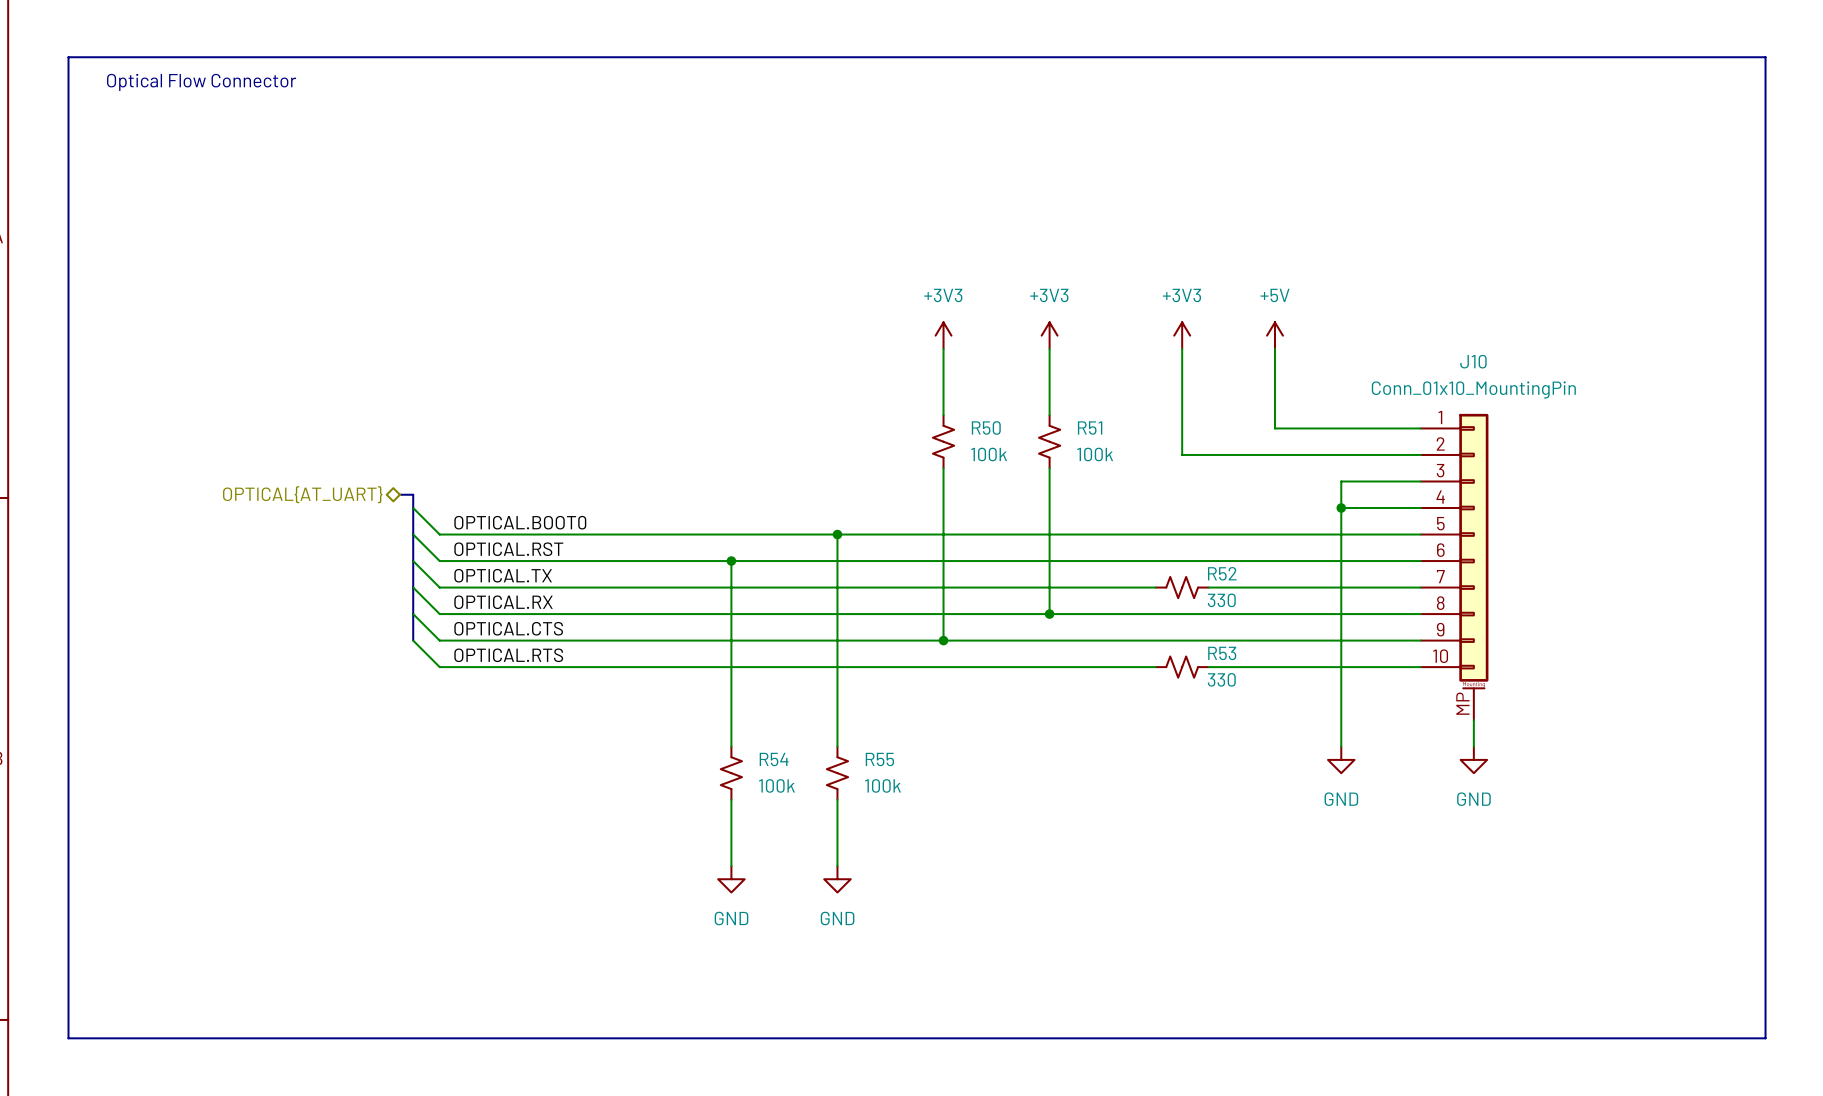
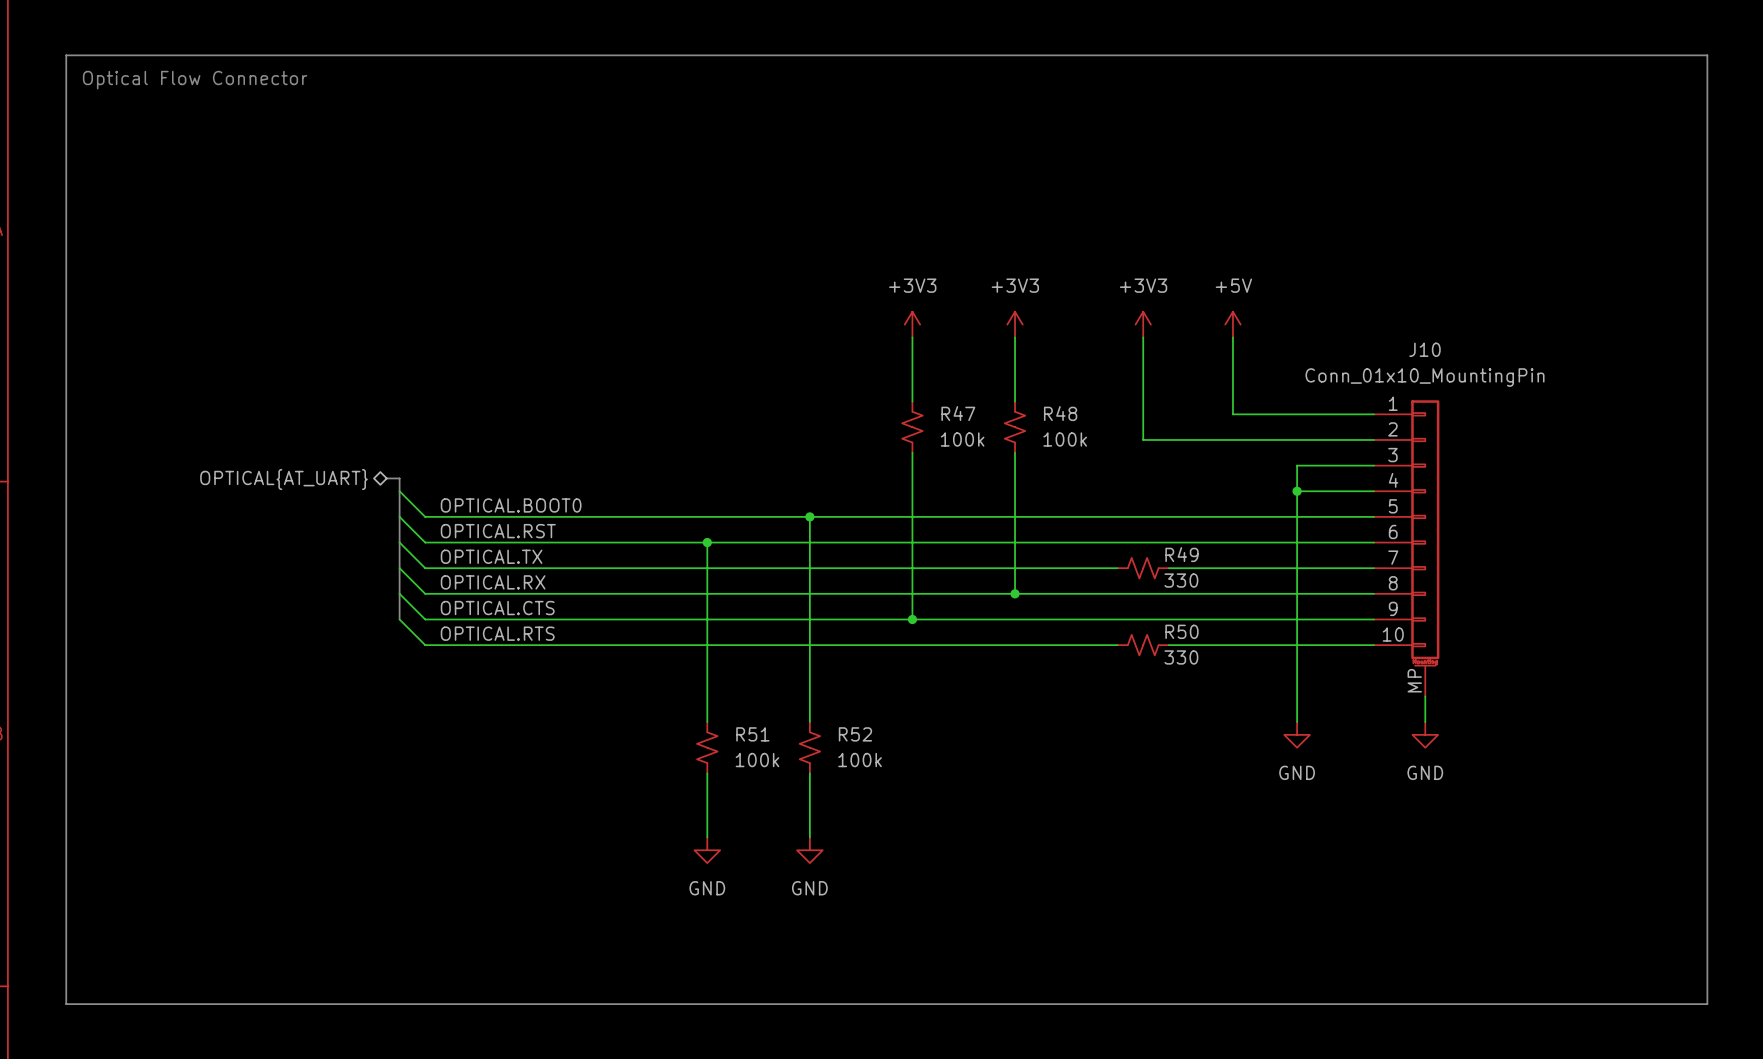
R50 name: R50 (986, 427) -> R47 (958, 413)
R51 name: R51 (1090, 428) -> R48 (1060, 413)
R52 name: R52 (1222, 573) -> R49 (1182, 554)
R53 name: R53 (1222, 653) -> R50 (1182, 631)
R54 name: R54 (774, 759) -> R51 (752, 734)
R55 name: R55 (879, 759) -> R52 (855, 734)

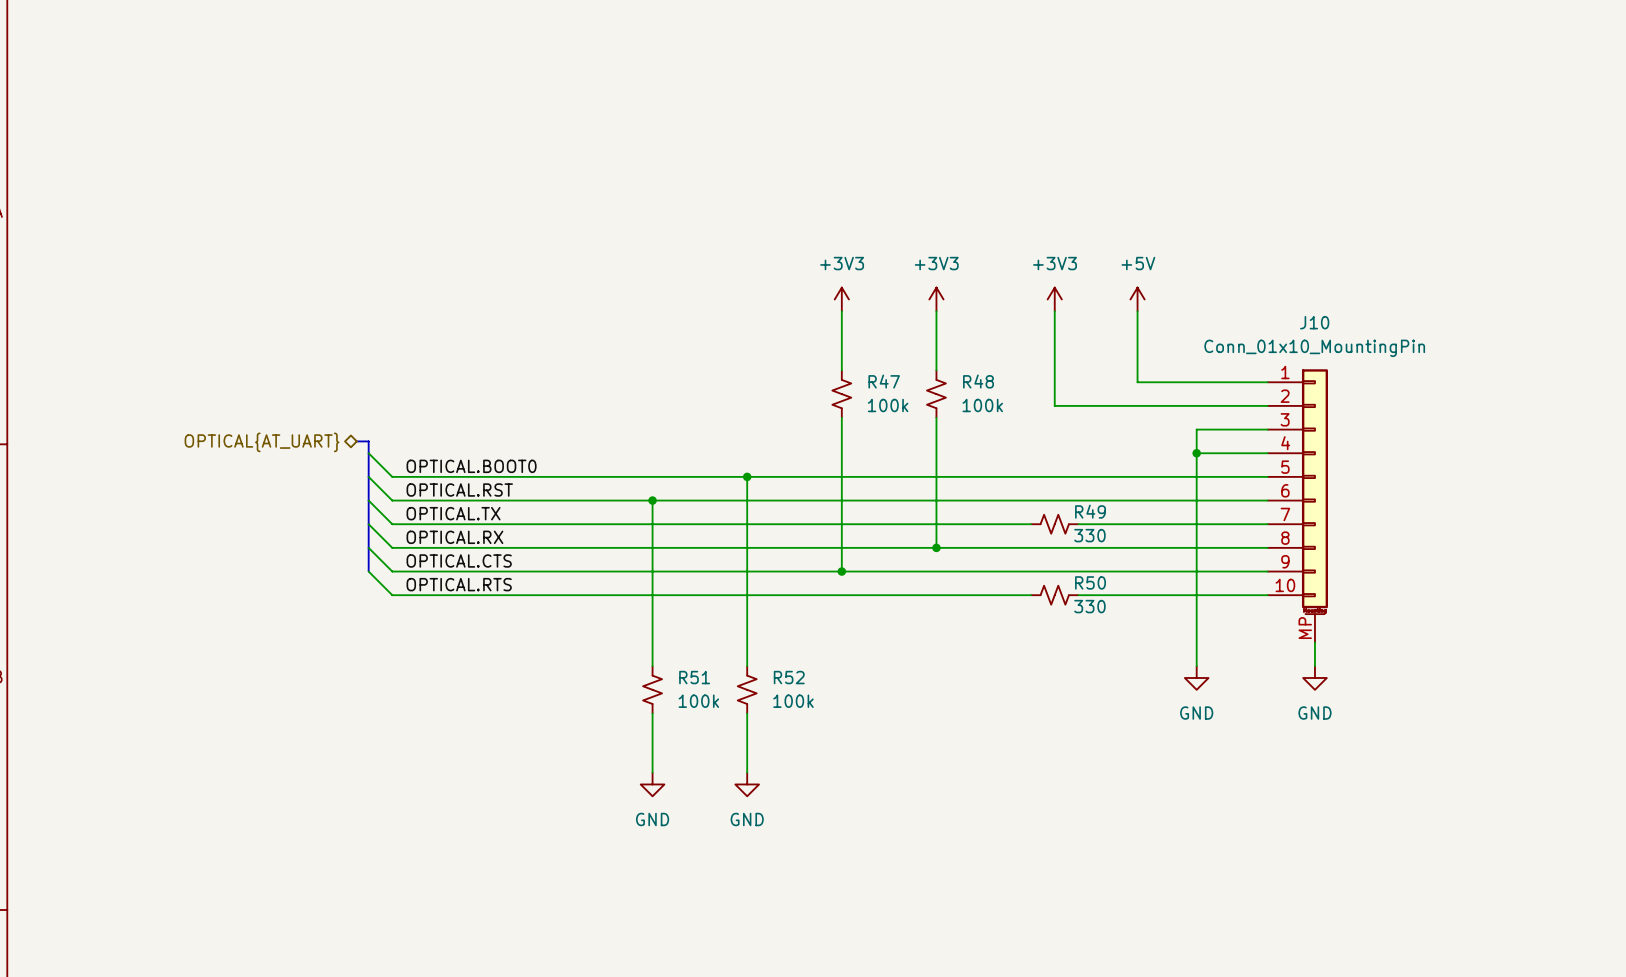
line: (66, 55) (1707, 55) (1707, 1004) (66, 1004) (66, 55) -> none
text: Optical Flow Connector (195, 80) -> none

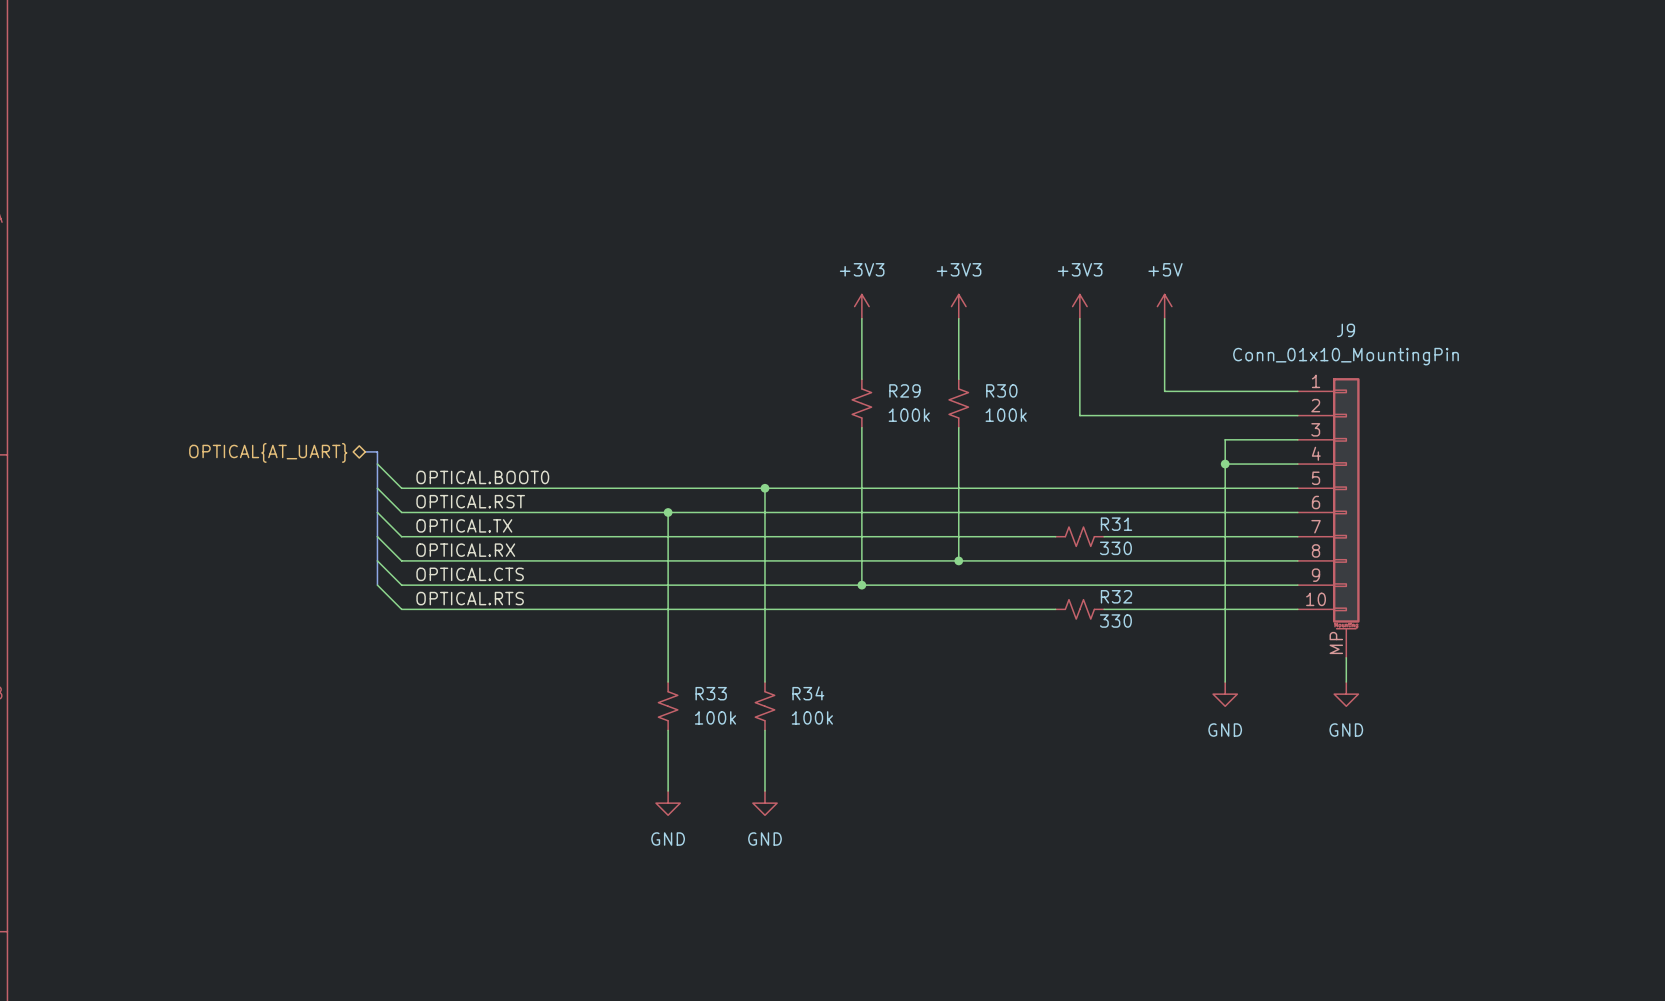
J10 name: J10 (1314, 322) -> J9 (1346, 330)
R47 name: R47 (884, 381) -> R29 (904, 390)
R48 name: R48 (978, 381) -> R30 (1001, 390)
R49 name: R49 (1090, 511) -> R31 (1116, 524)
R50 name: R50 (1090, 582) -> R32 (1116, 596)
R51 name: R51 (694, 677) -> R33 (711, 693)
R52 name: R52 (789, 677) -> R34 (808, 693)

